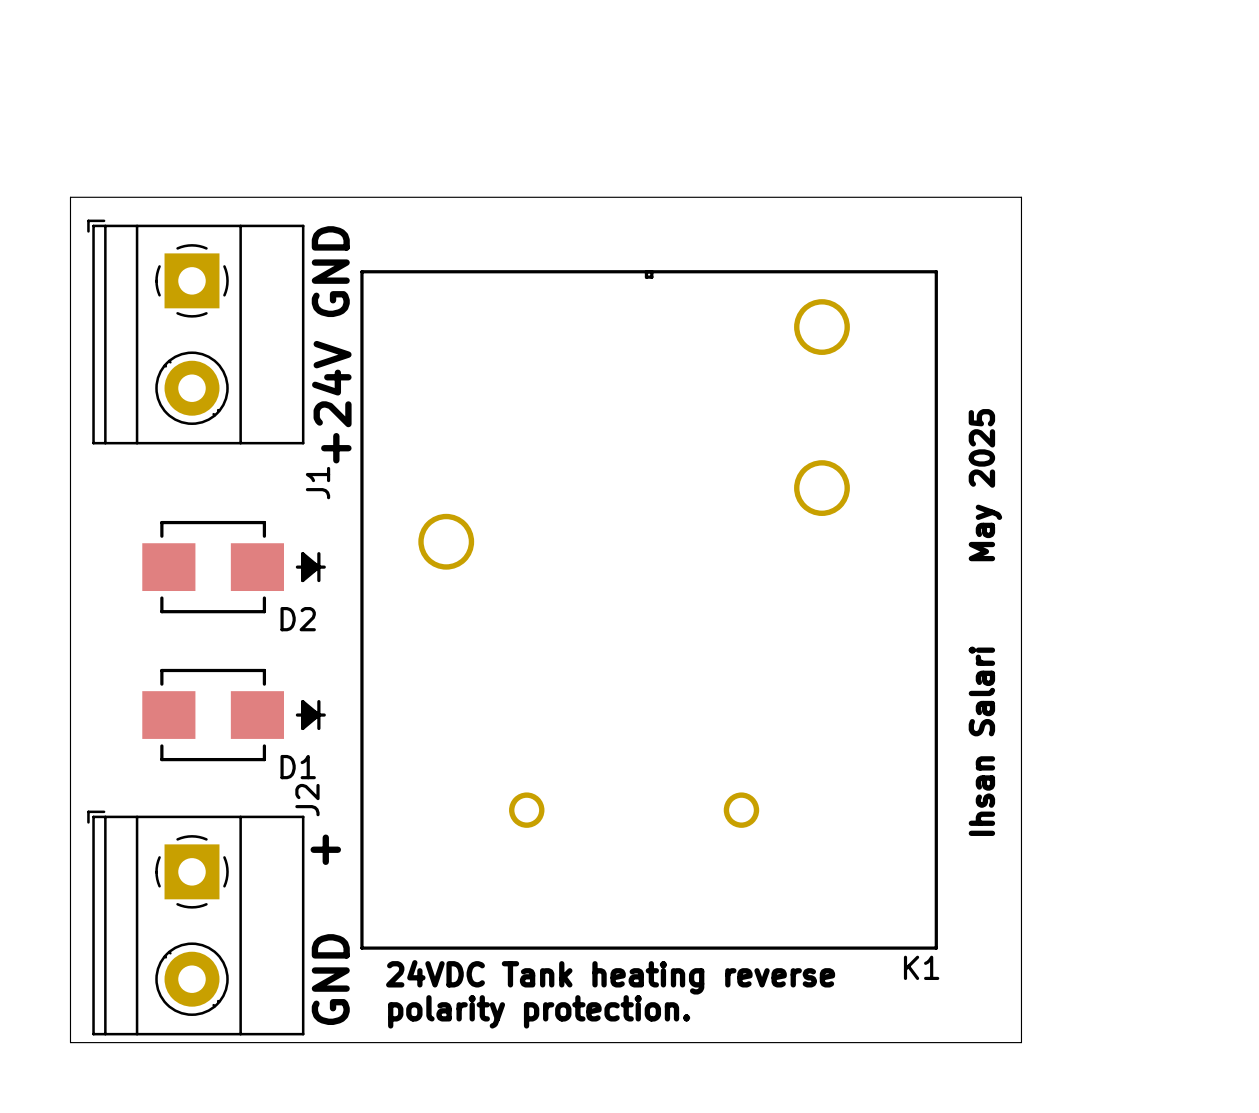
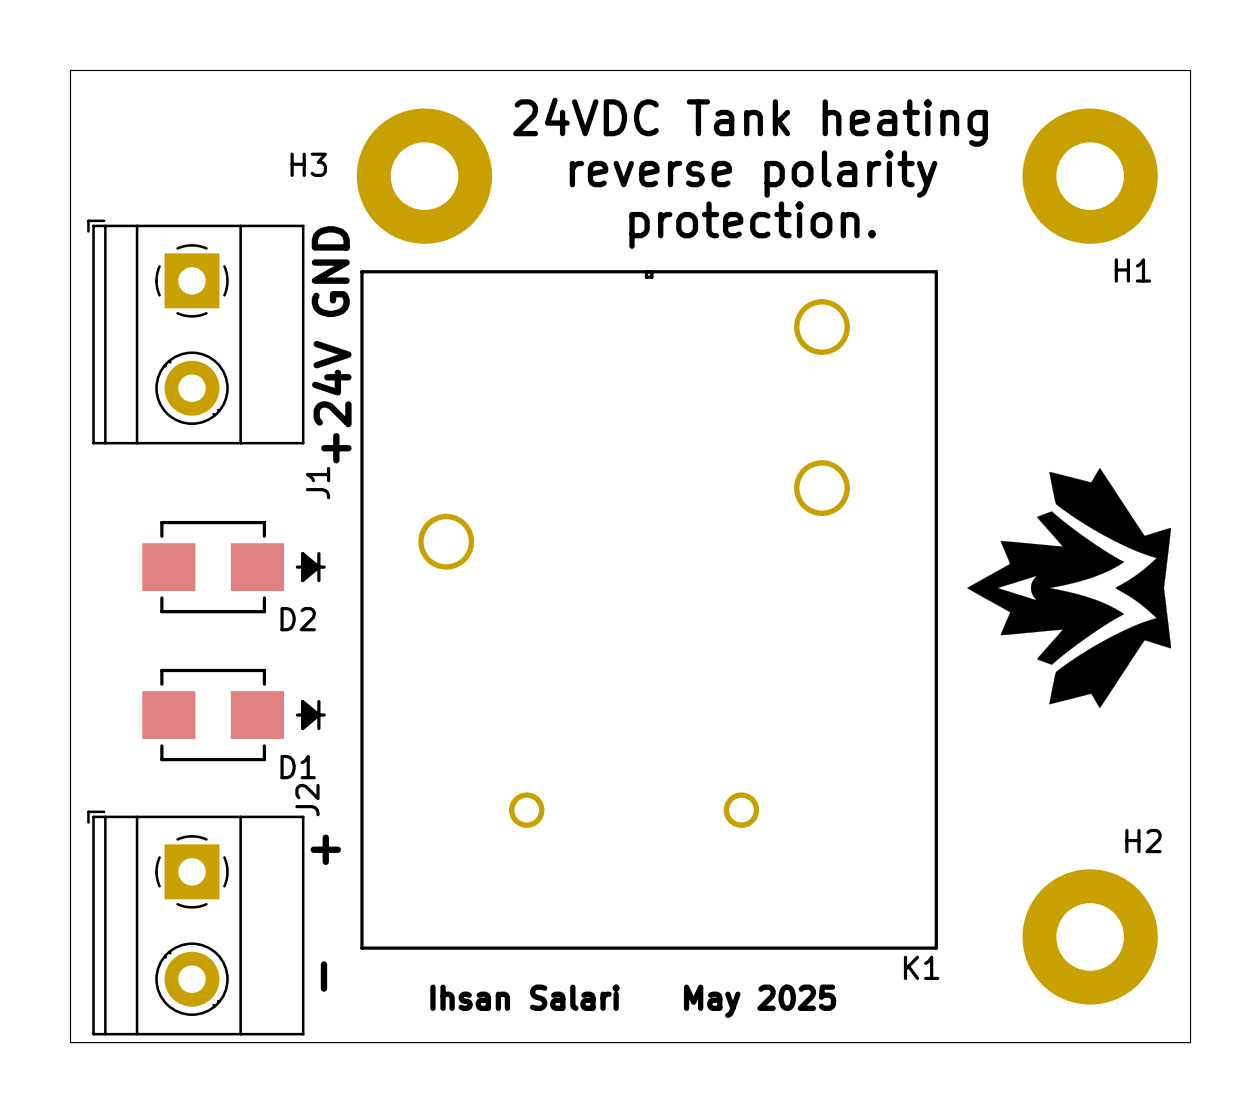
text: none -> 24VDC Tank heating (750, 122)
text: none -> reverse polarity (753, 174)
H3: none -> (424, 176)
H1: none -> (1090, 176)
board edge: (70, 197) (1021, 197) (1021, 1042) -> (70, 197) (70, 70) (1190, 70) (1190, 1042) (1021, 1042)
text: none -> protection. (752, 225)
drawing: none -> [967, 468, 1172, 709]
text: May 2025 (985, 485) -> none
text: Ihsan Salari (981, 741) -> none
H2: none -> (1090, 936)
text: none -> - (323, 976)
text: 24VDC Tank heating reverse (610, 977) -> none
text: GND (330, 979) -> none
text: none -> Ihsan Salari (525, 997)
text: none -> May 2025 (760, 1001)
text: polarity protection. (539, 1011) -> none

